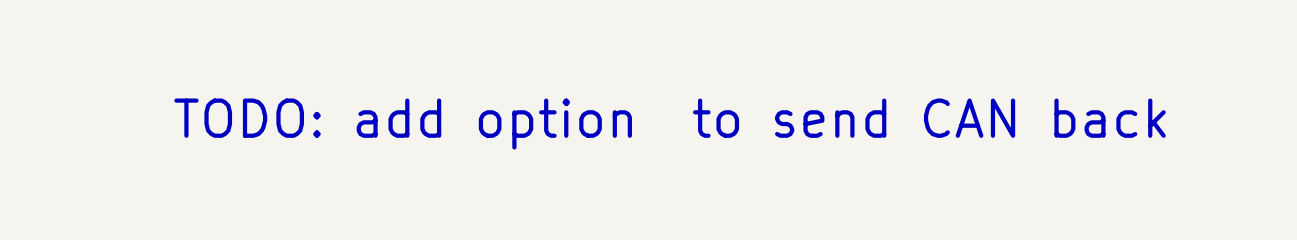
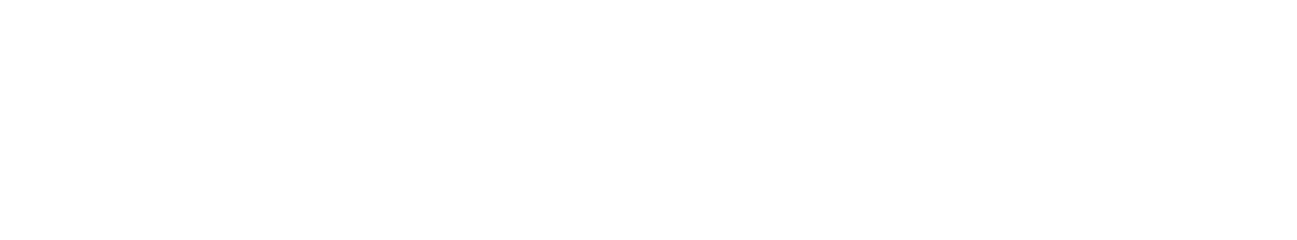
text: TODO: add option to send CAN back (670, 124) -> none

